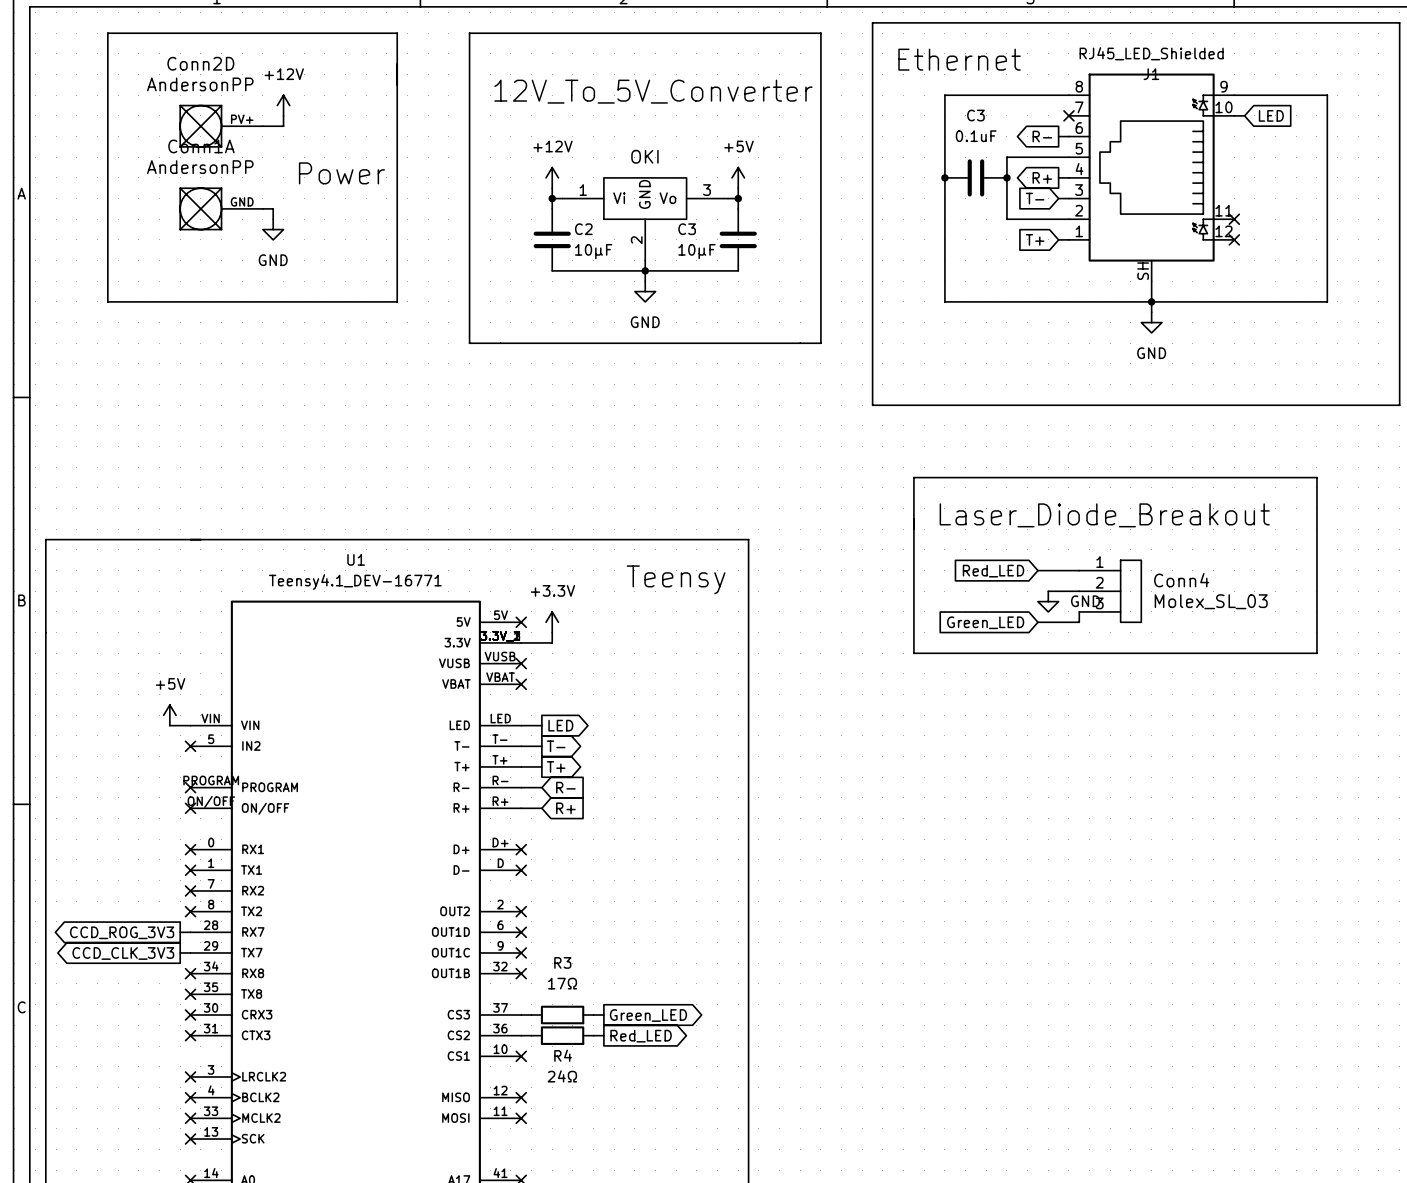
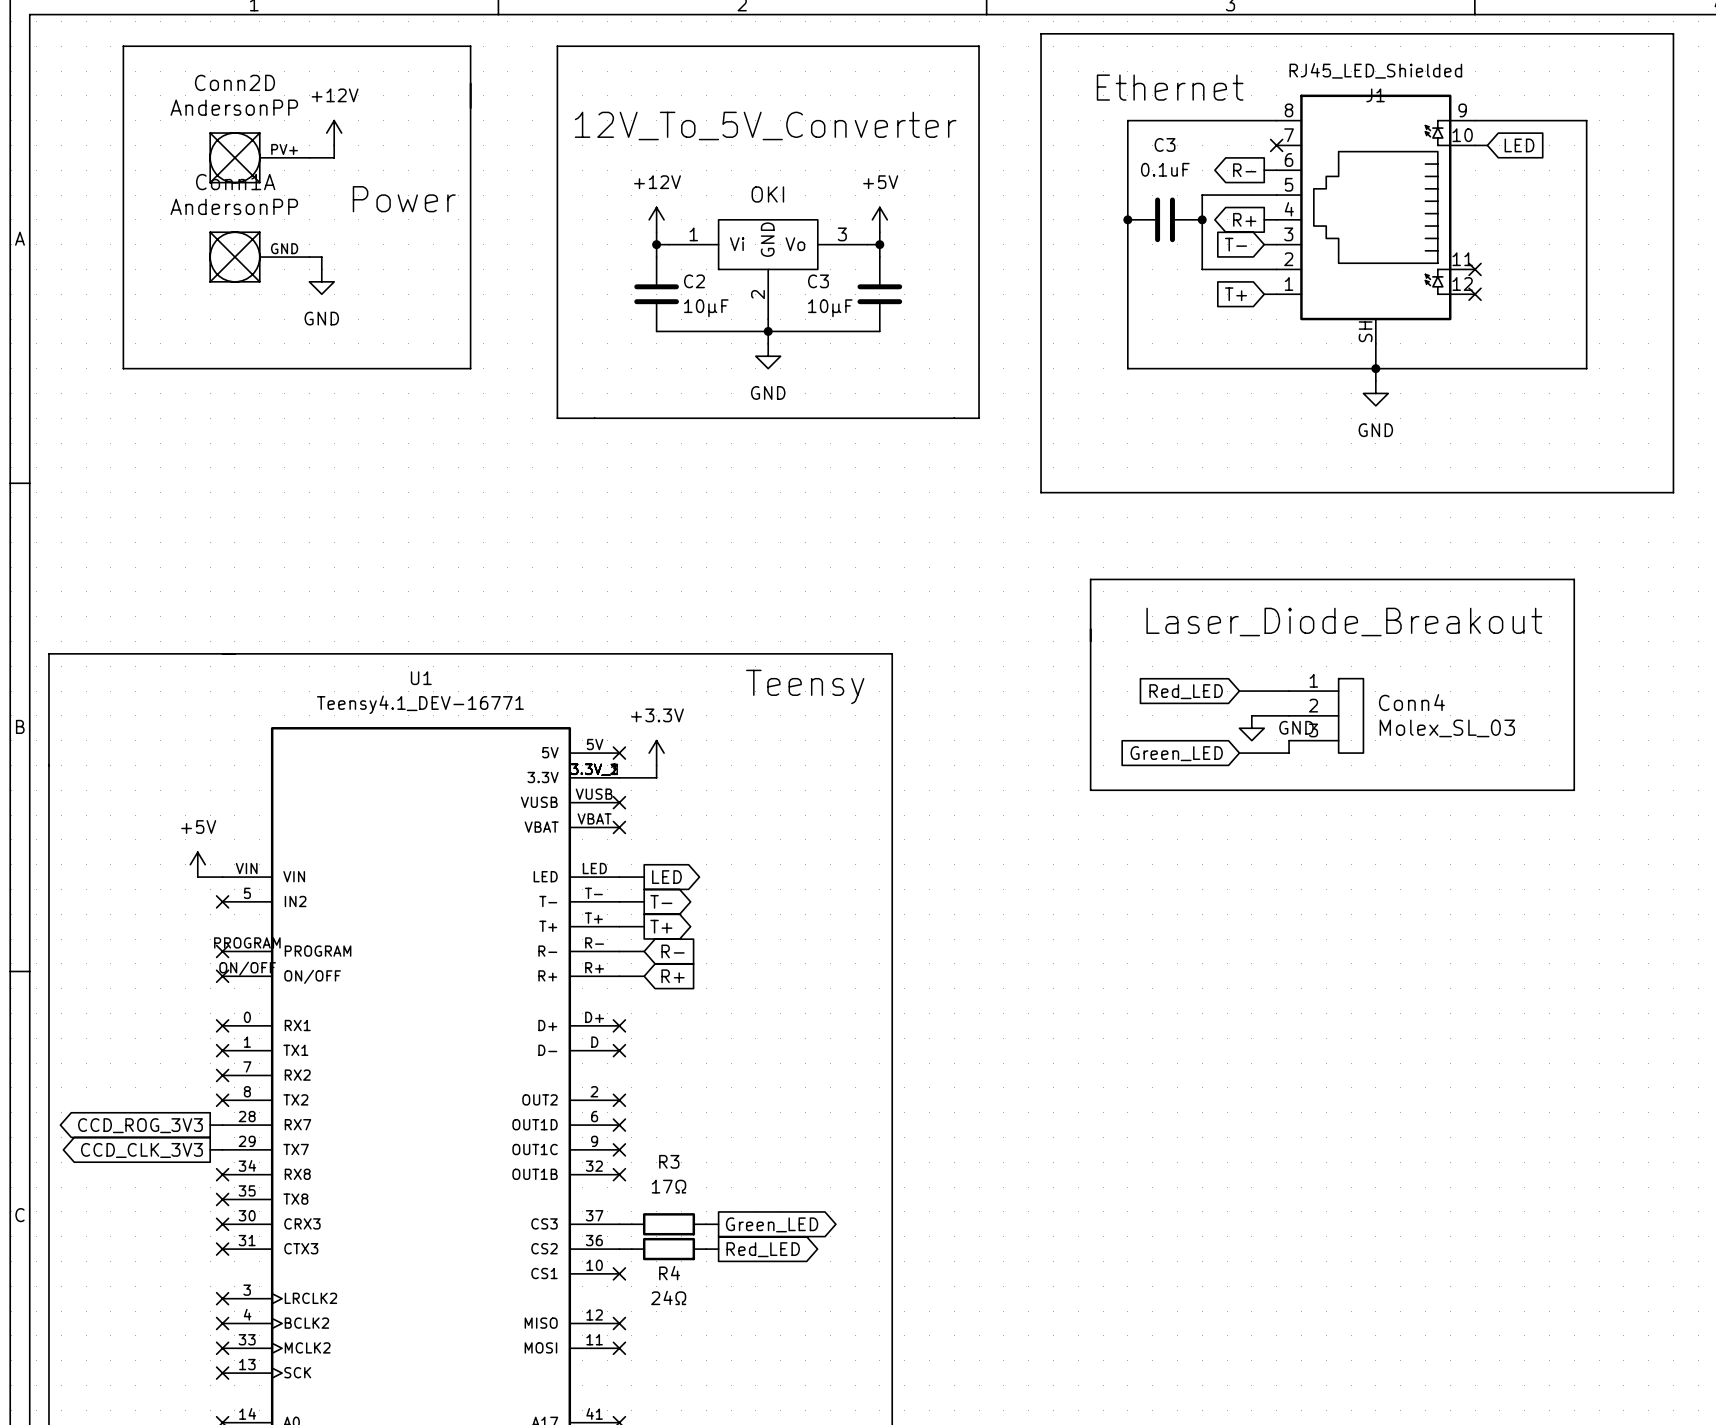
text: Ethernet (959, 59) -> none
label: none -> Ethernet (1170, 87)
text: 12V_To_5V_Converter (653, 91) -> none
label: none -> 12V_To_5V_Converter (765, 125)
label: none -> Power (404, 199)
text: Power (341, 173) -> none
label: none -> Laser_Diode_Breakout (1344, 621)
text: Laser_Diode_Breakout (1104, 515) -> none
label: none -> Teensy (805, 686)
text: Teensy (676, 579) -> none

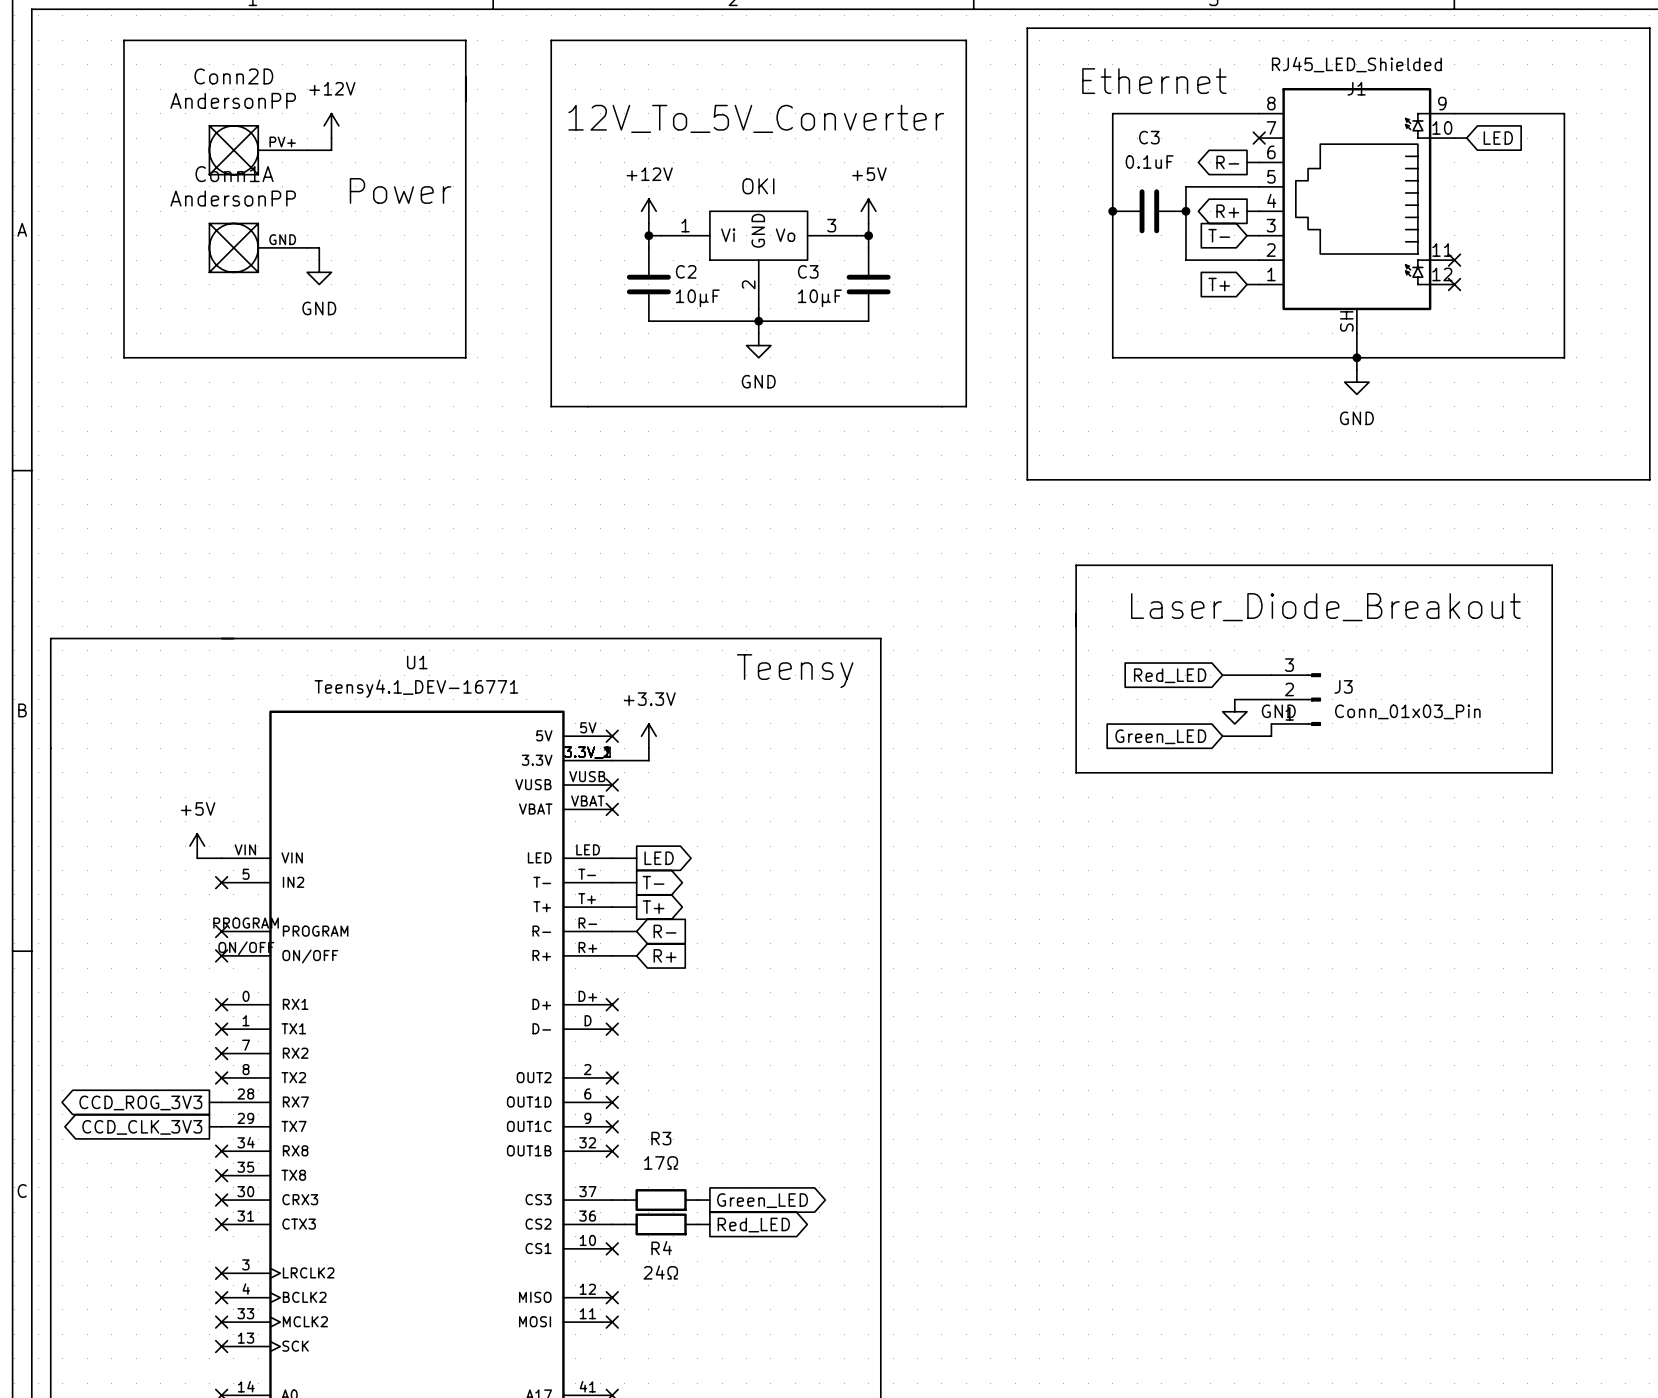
J3: none -> Conn_01x03_Pin (1296, 699)
Conn4: Molex_SL_03 (1326, 715) -> none

